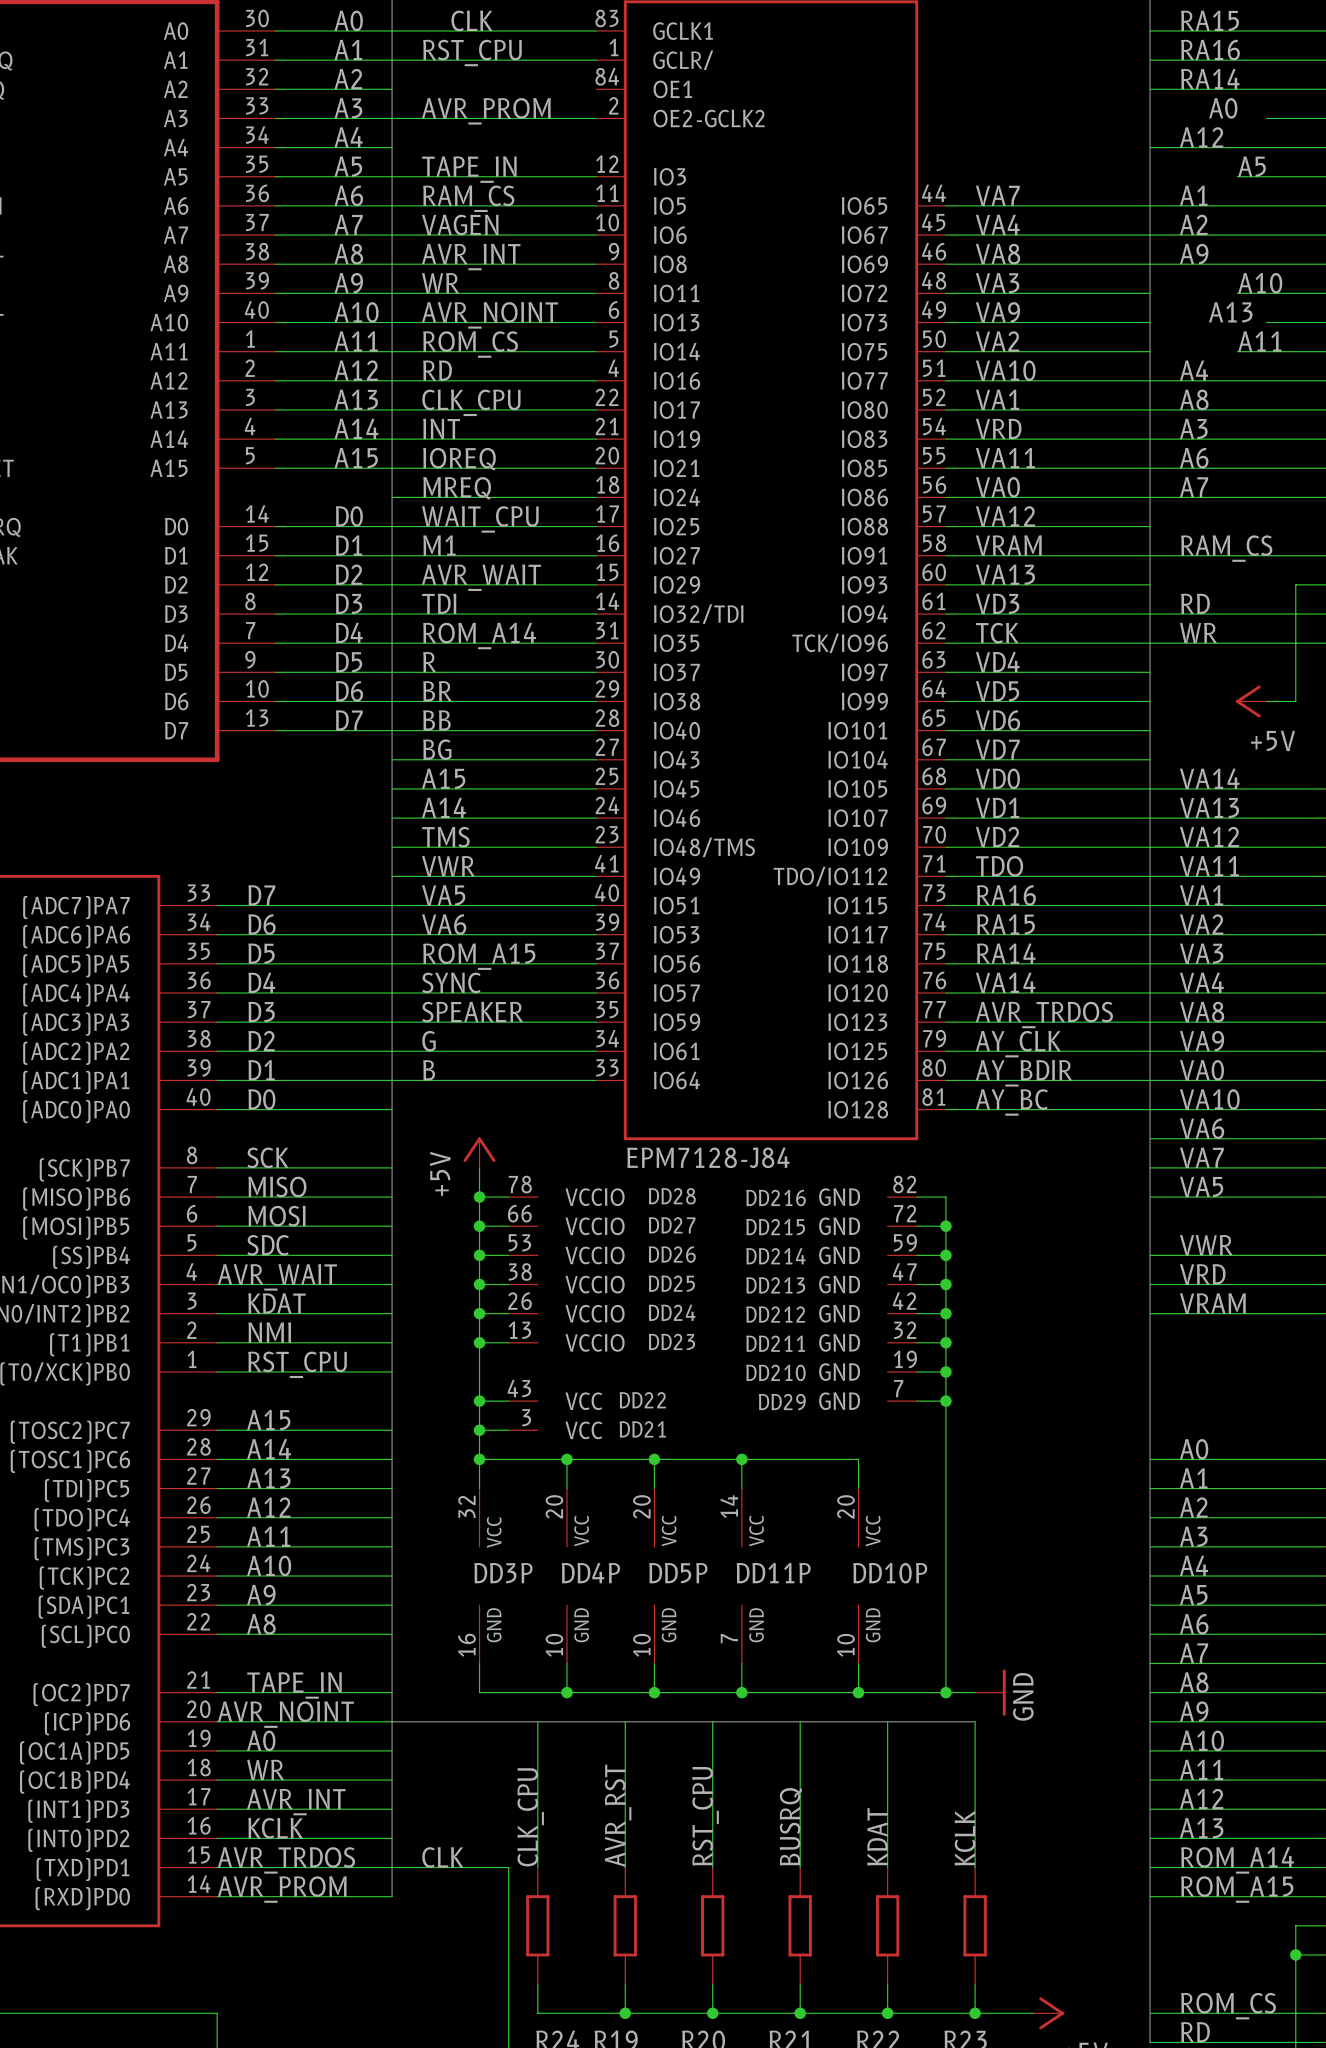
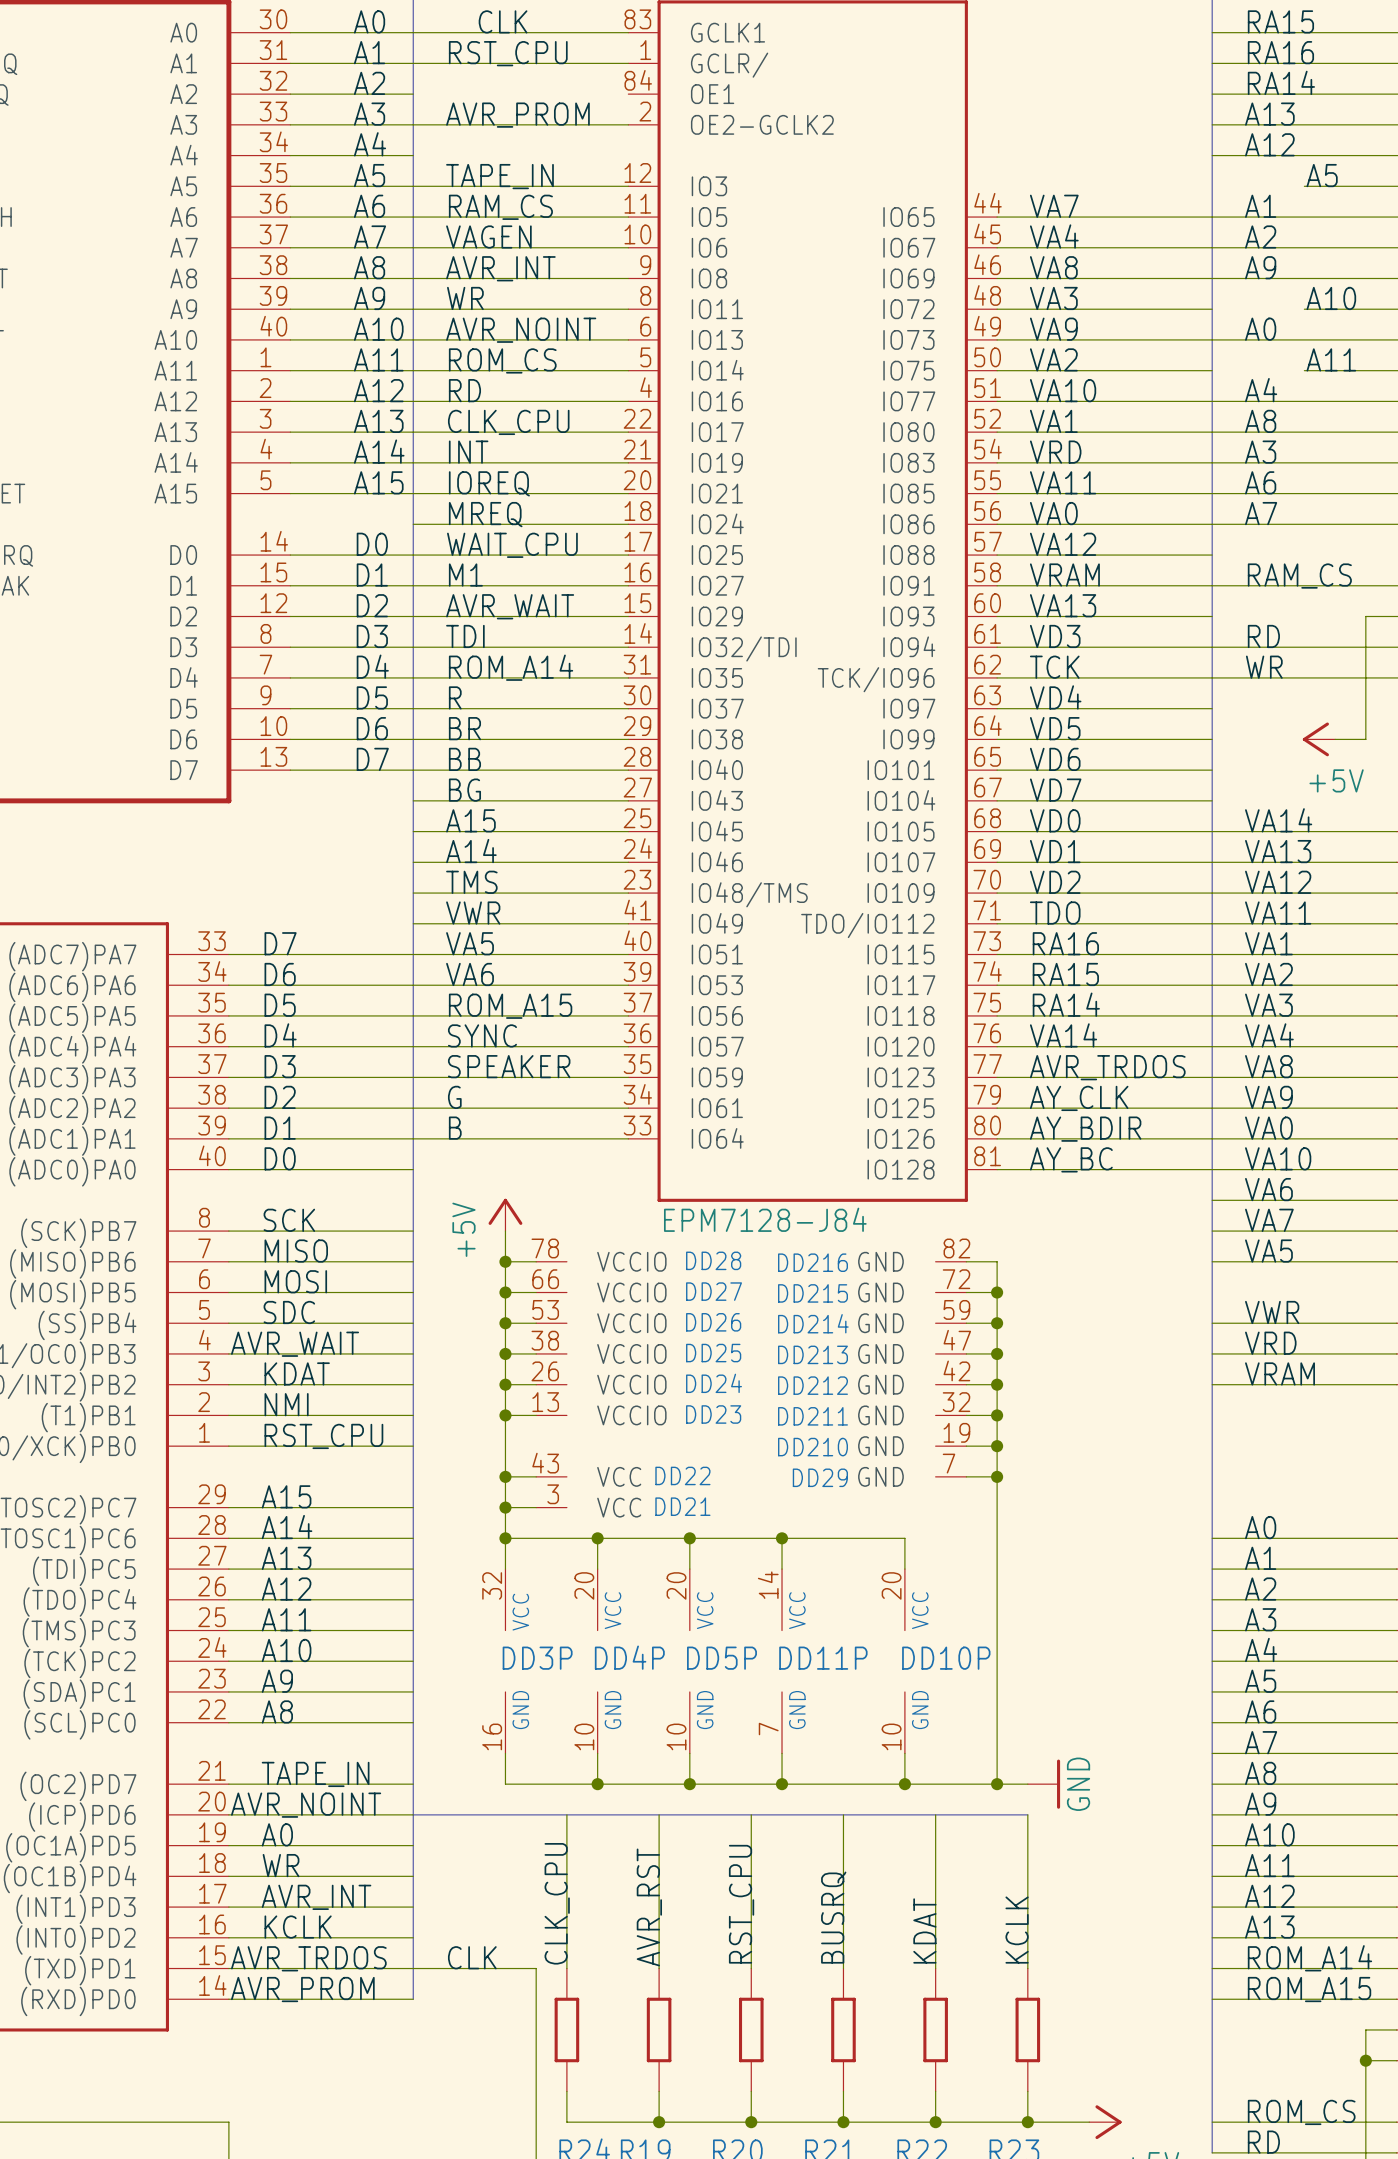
label position: A0 (1223, 108) -> A0 (1260, 329)
wire: none -> (1212, 124) (1335, 124)
label position: A13 (1230, 312) -> A13 (1269, 114)
wire: none -> (1212, 339) (1335, 339)

